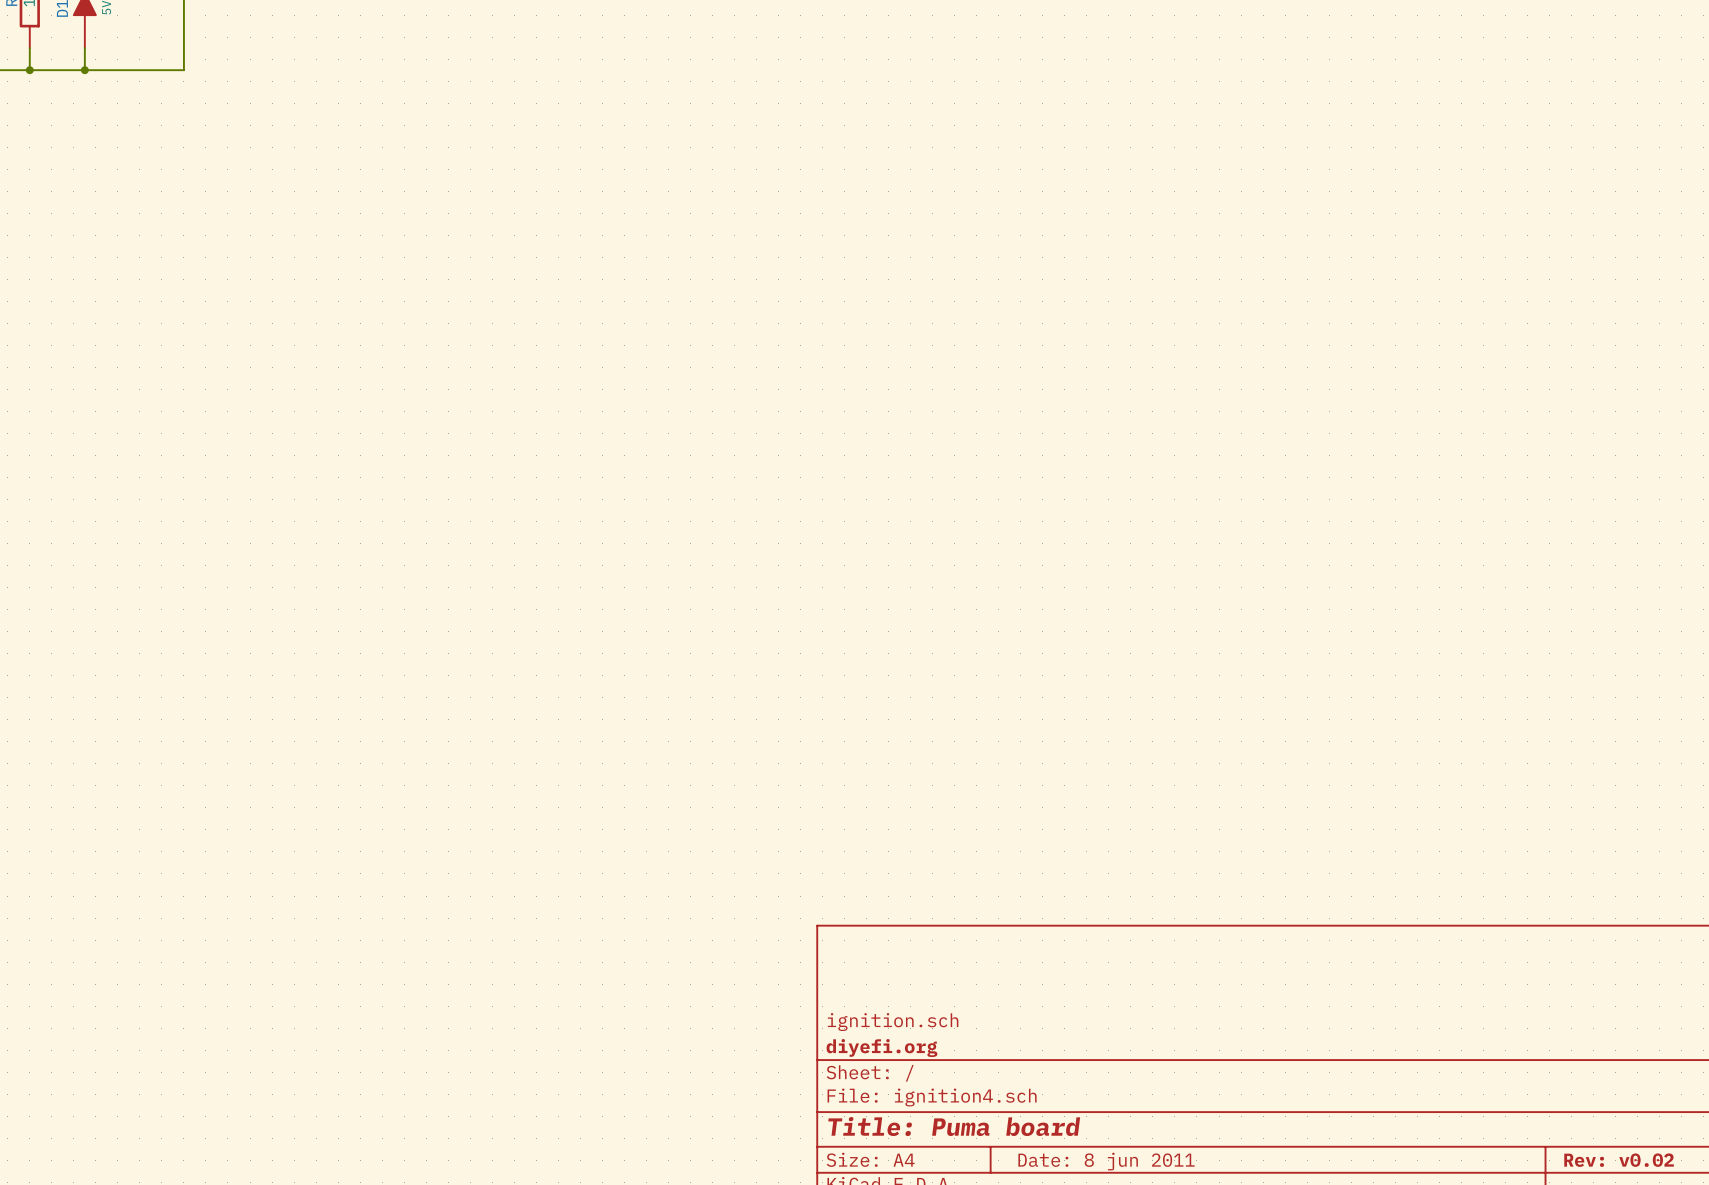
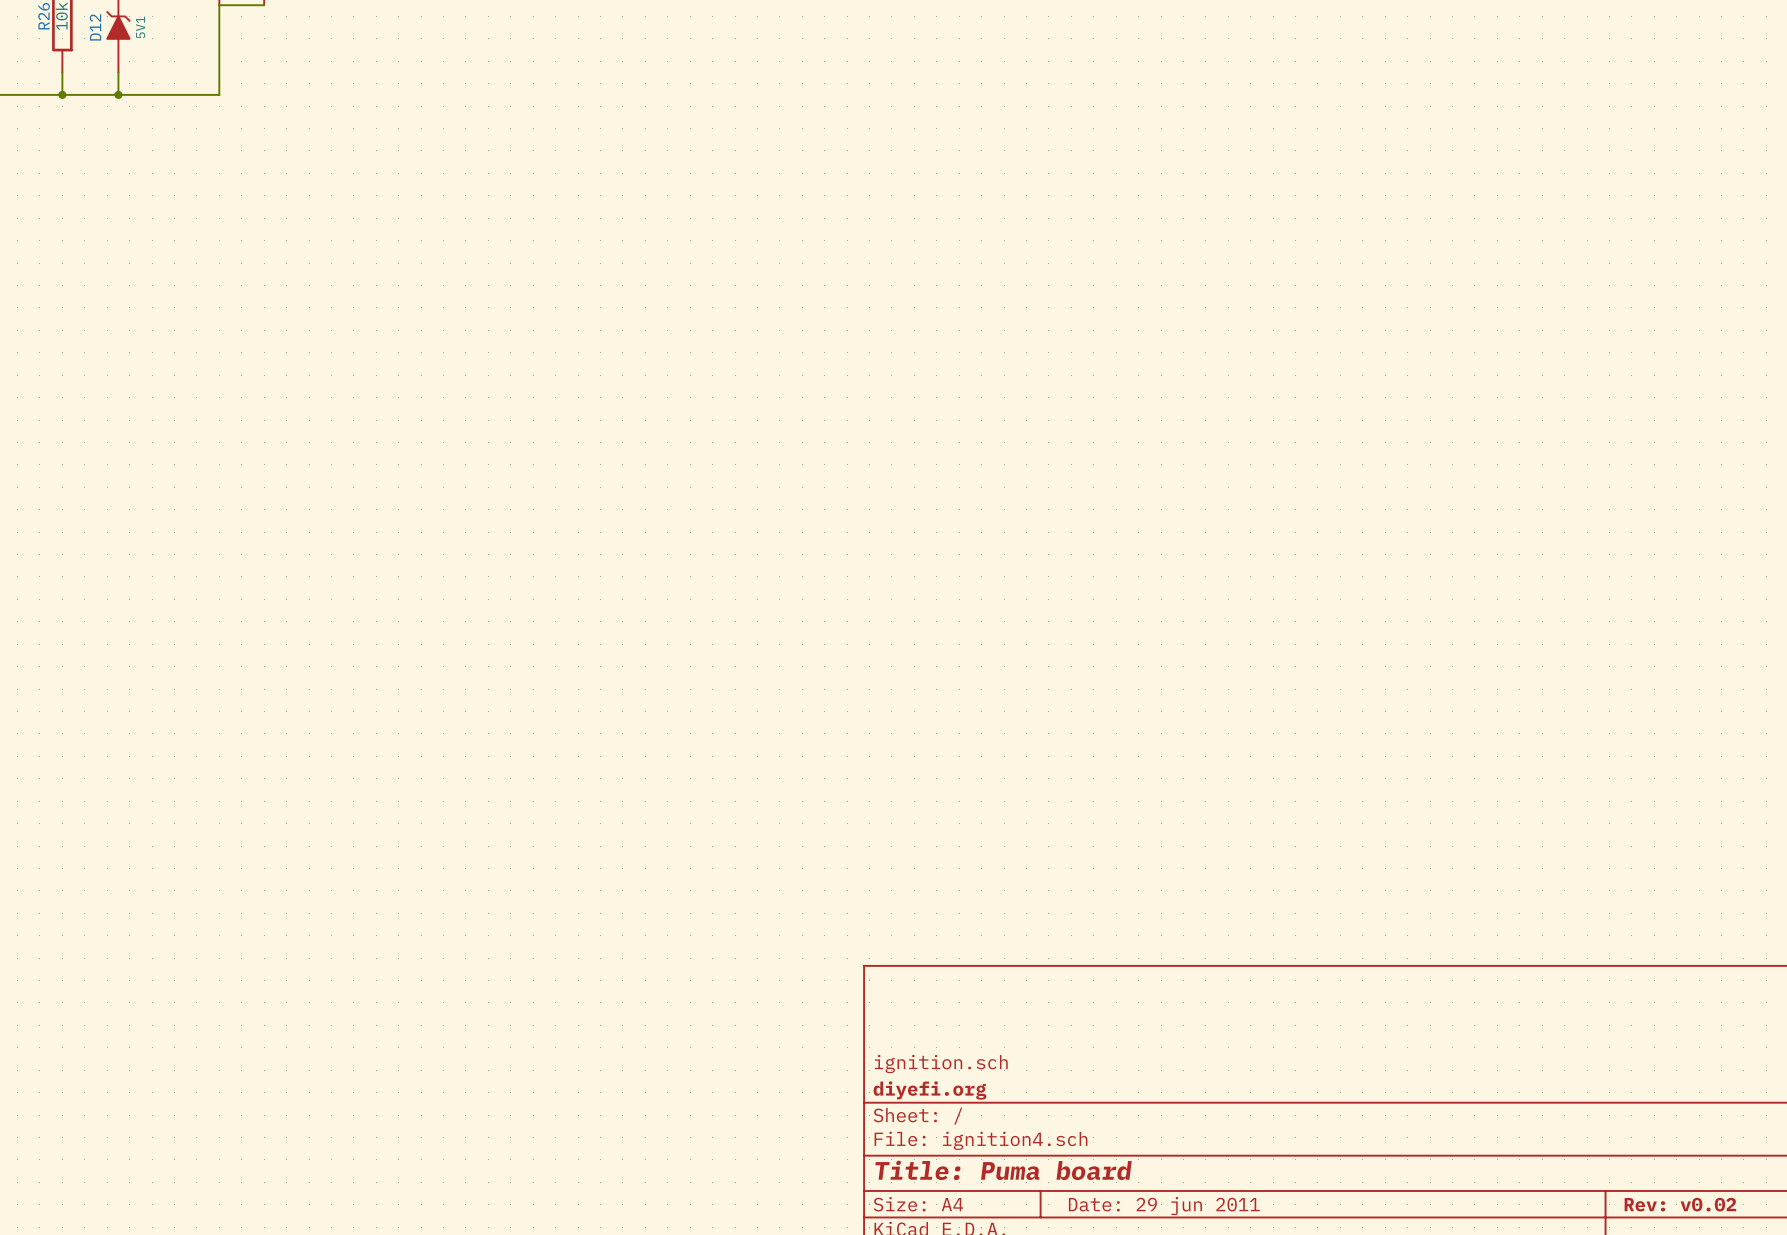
title block: Date: 8 jun 2011 (1106, 1161) -> Date: 29 jun 2011 (1164, 1206)

